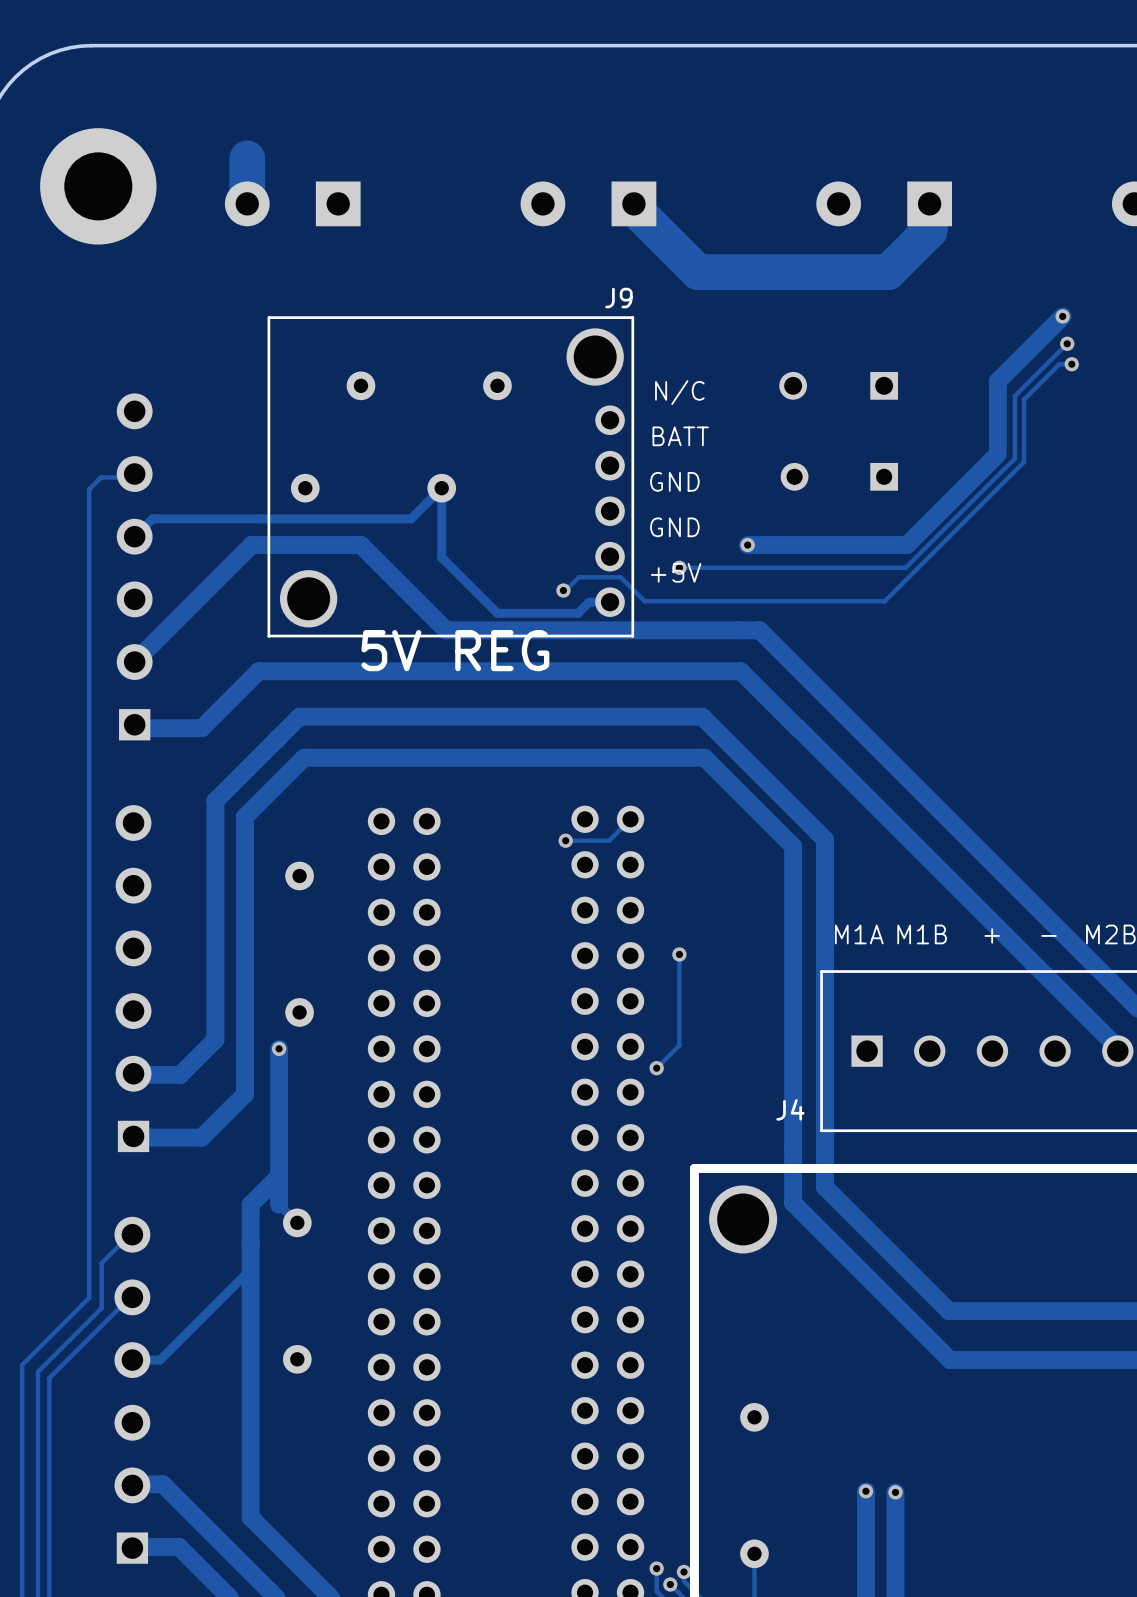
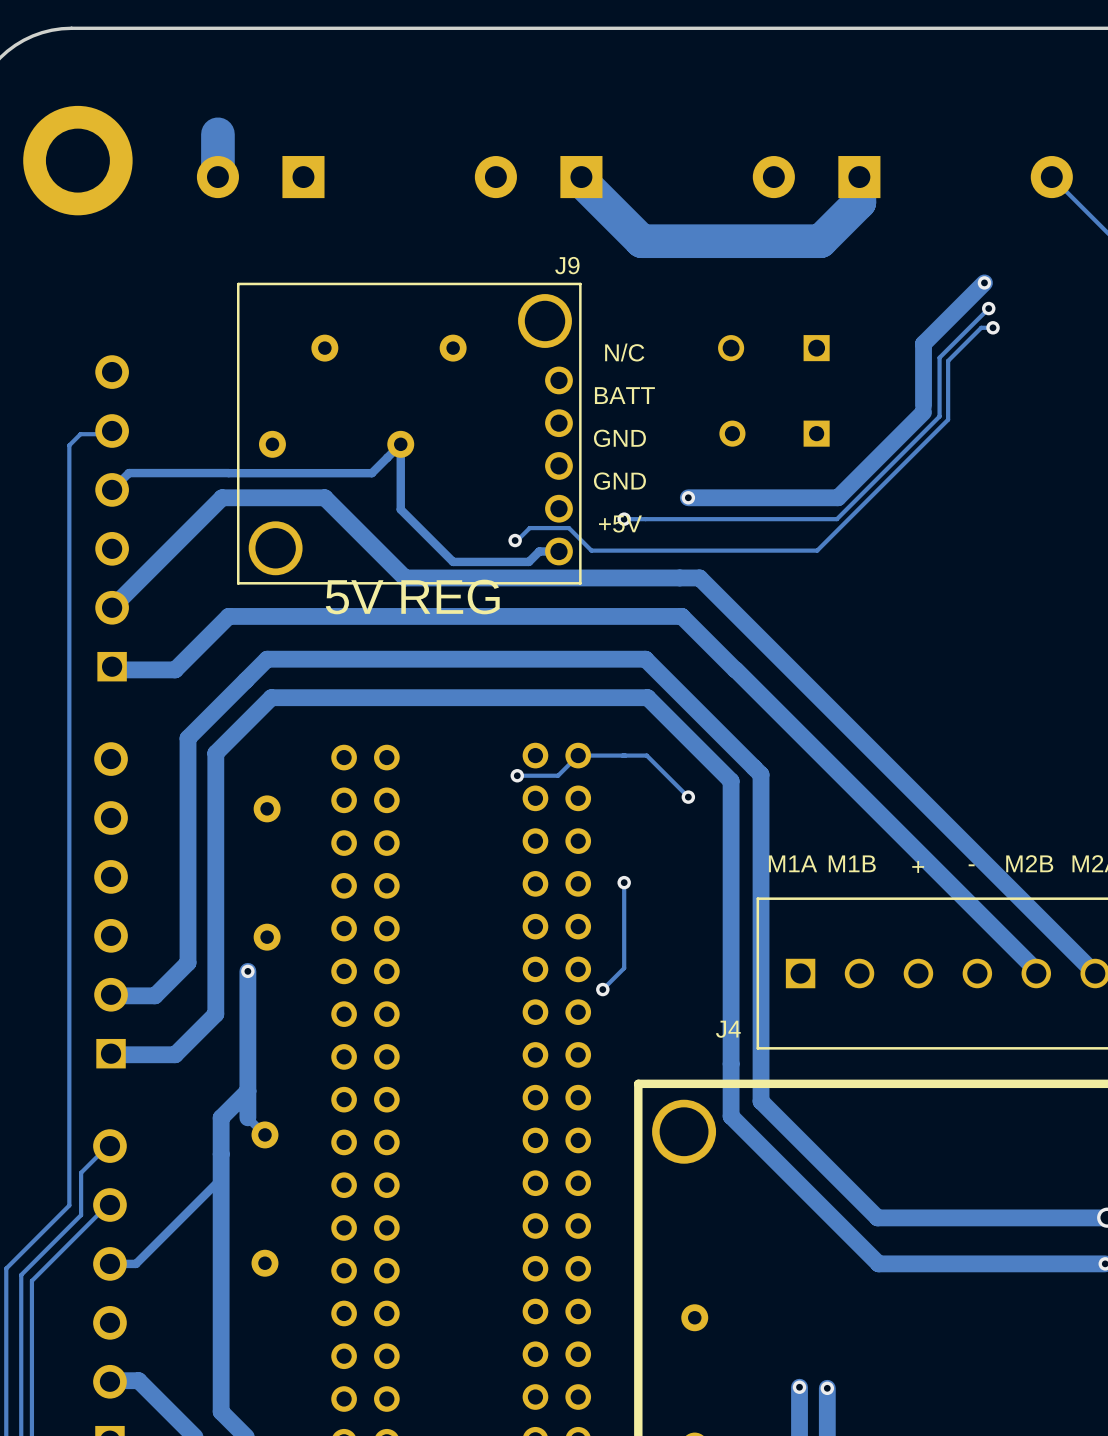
track: none -> (578, 755) (646, 755) (688, 797)
via: none -> (688, 797)

